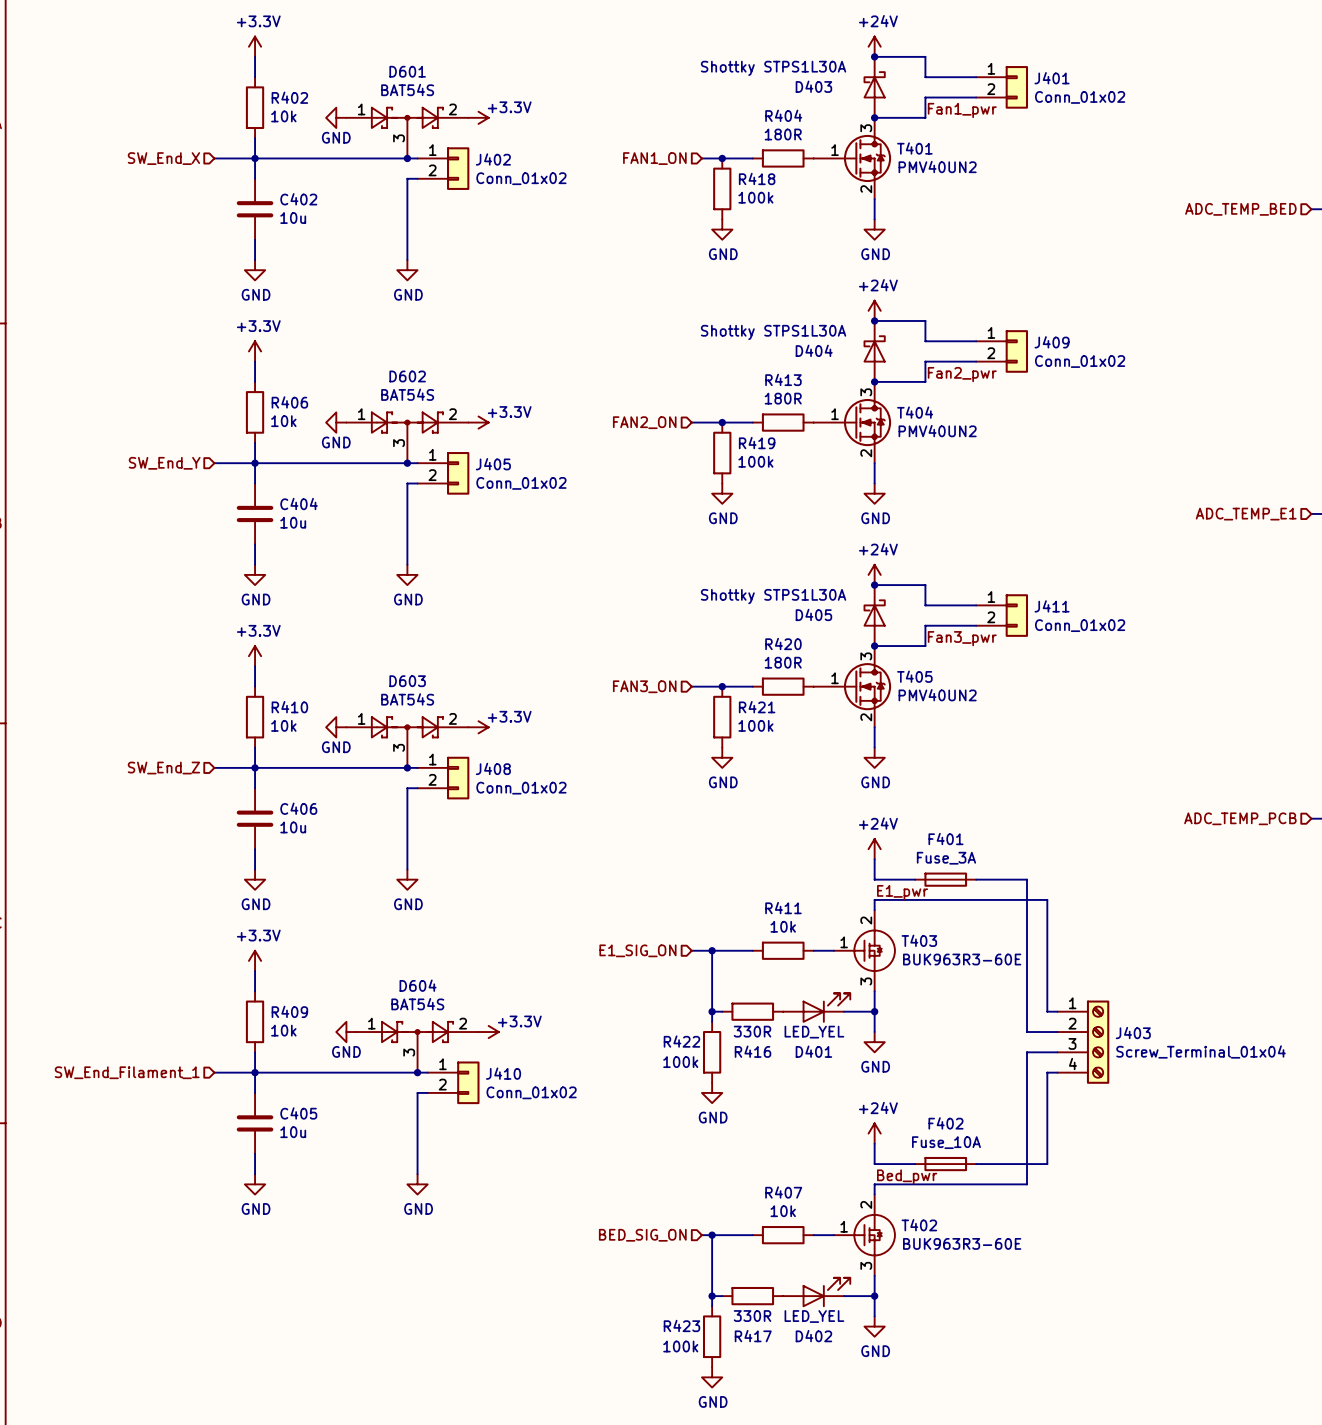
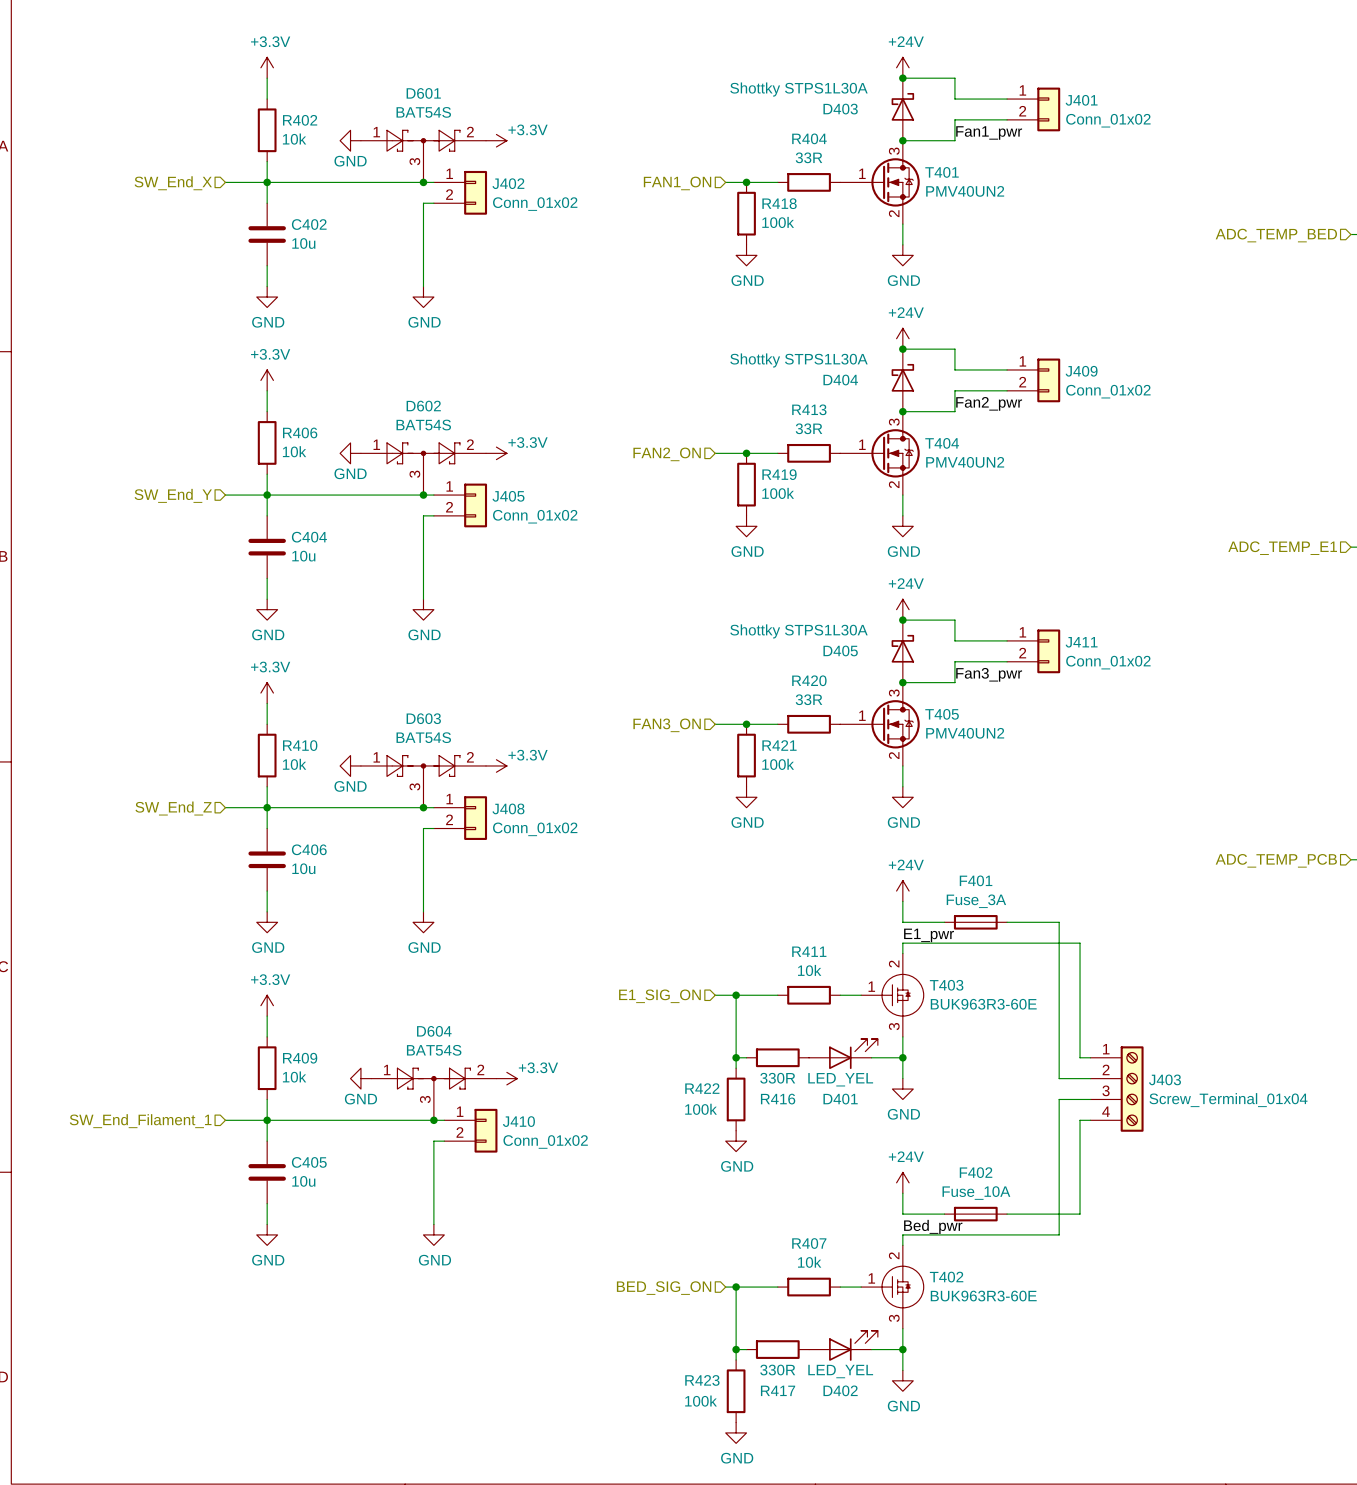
R404 value: 180R (783, 134) -> 33R (809, 157)
R413 value: 180R (783, 398) -> 33R (809, 428)
R420 value: 180R (783, 662) -> 33R (809, 699)

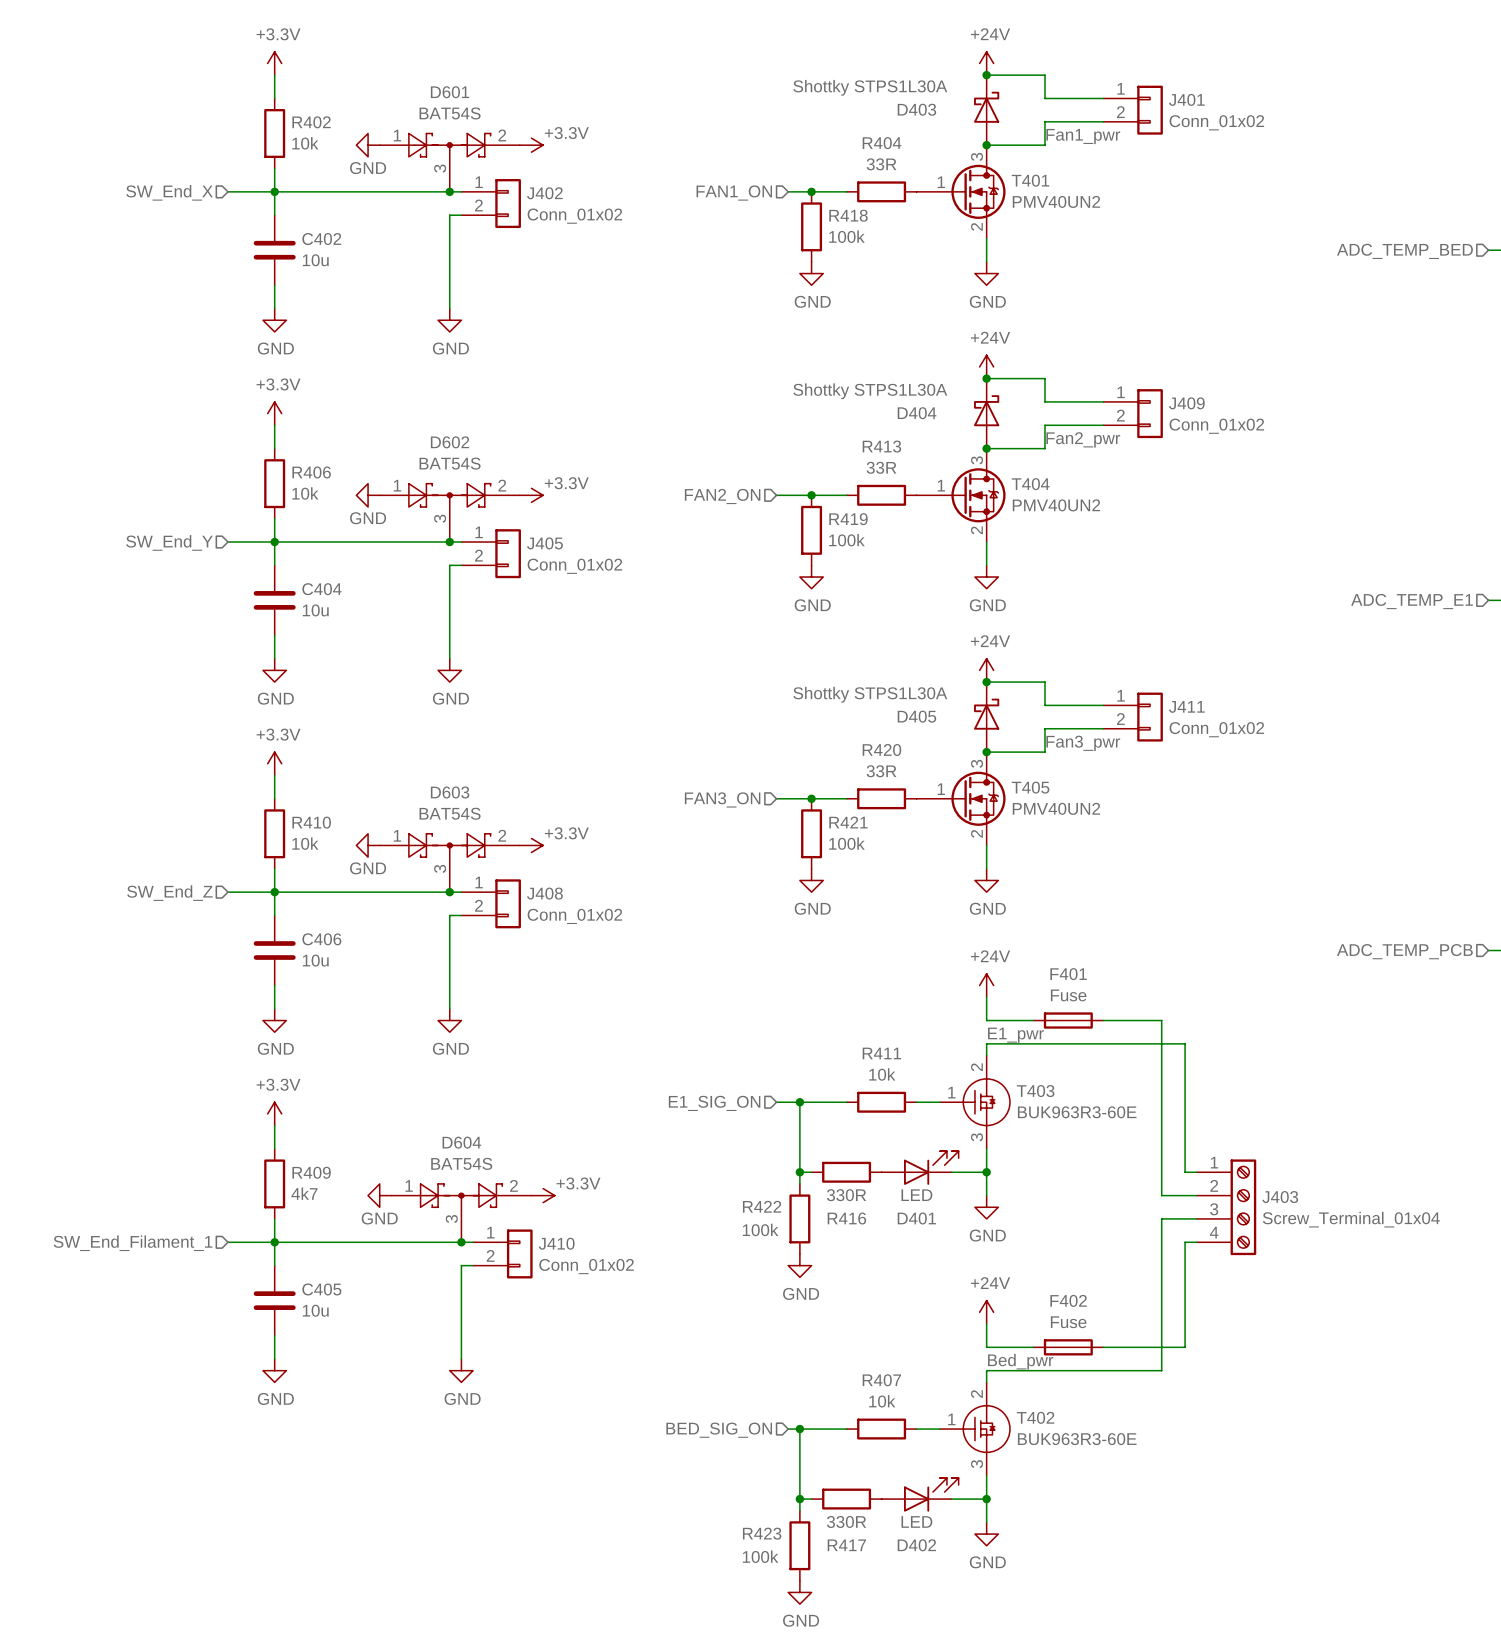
F401 value: Fuse_3A (976, 901) -> Fuse (1068, 995)
R409 value: 10k (294, 1076) -> 4k7 (304, 1193)
D401 value: LED_YEL (840, 1079) -> LED (916, 1195)
F402 value: Fuse_10A (976, 1193) -> Fuse (1068, 1322)
D402 value: LED_YEL (840, 1371) -> LED (916, 1521)

